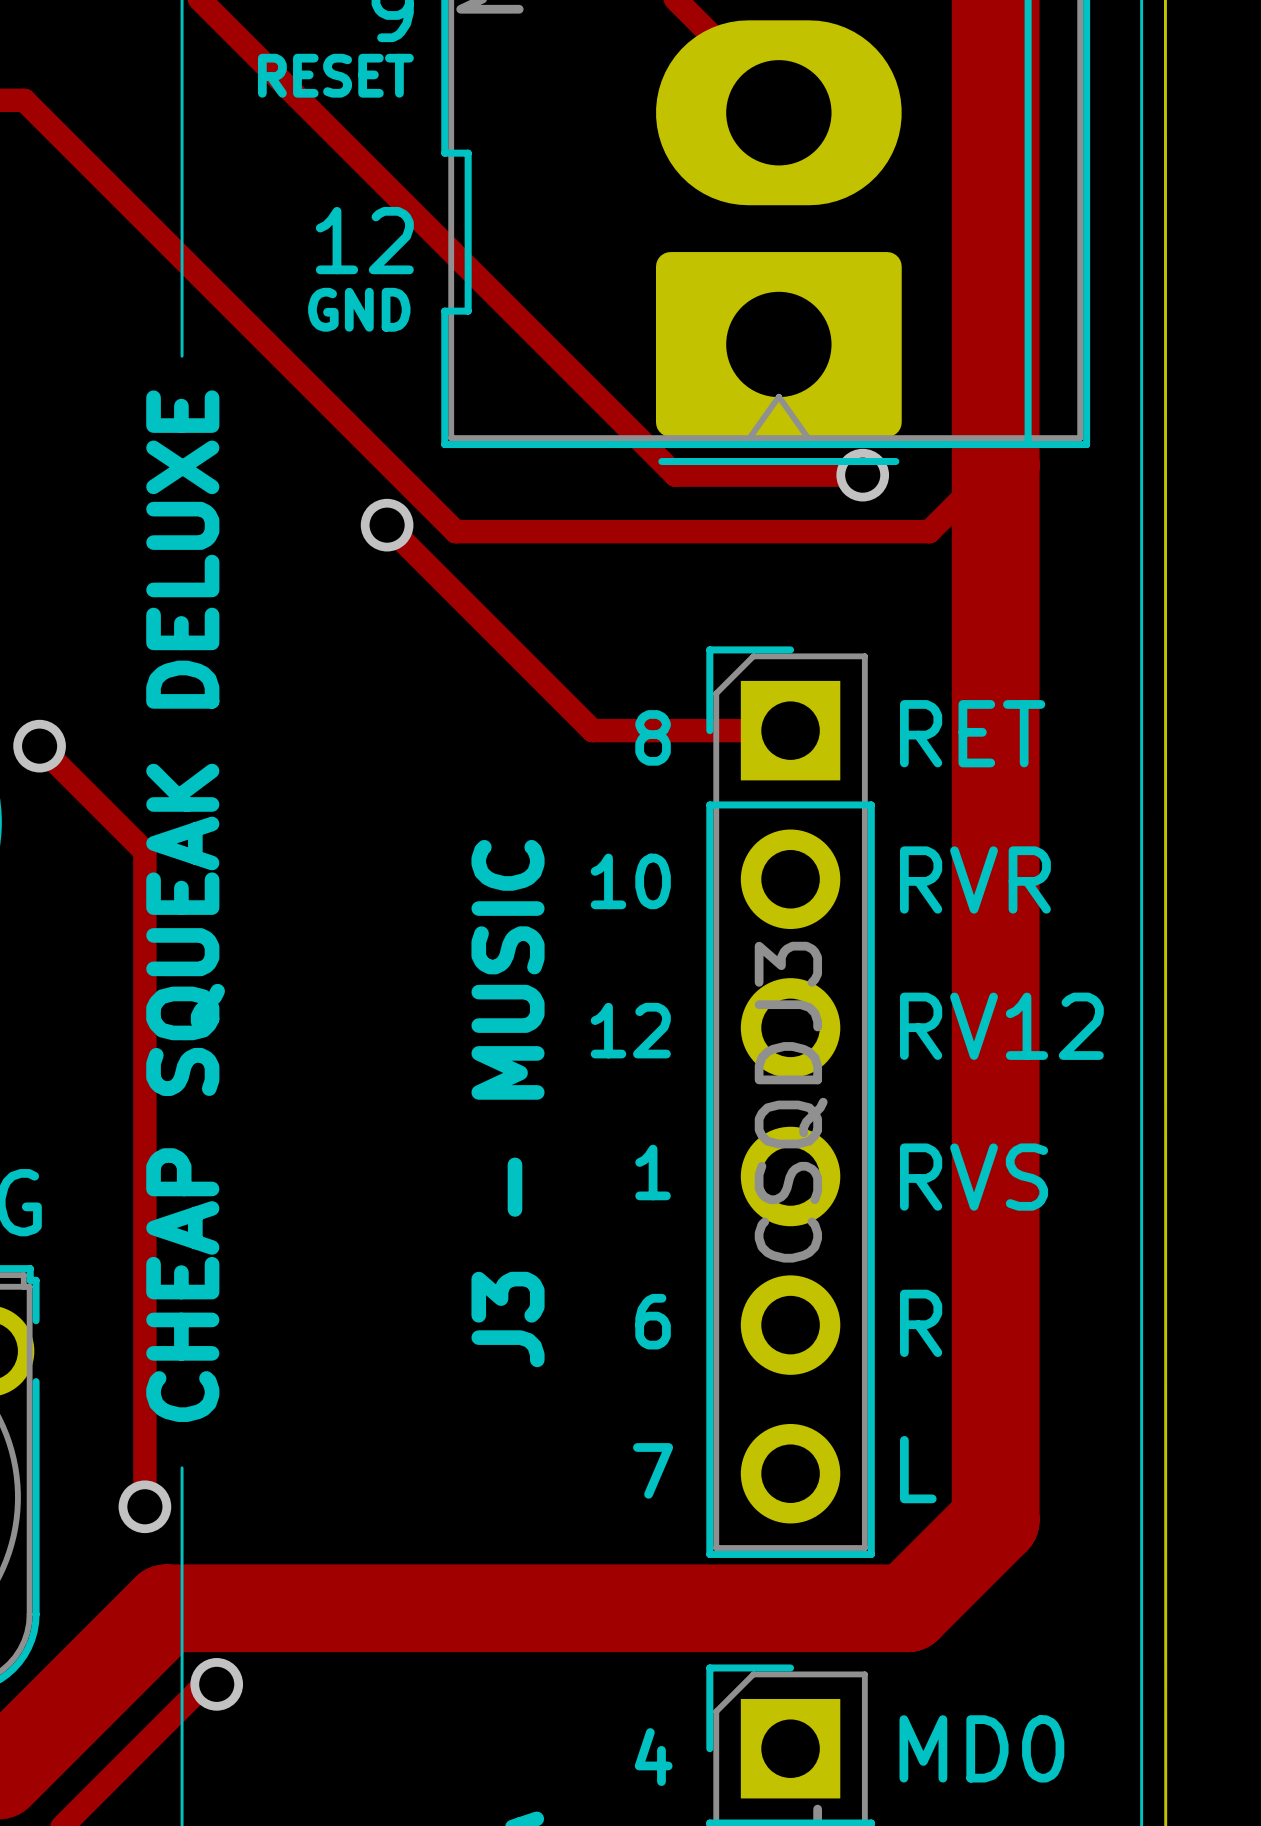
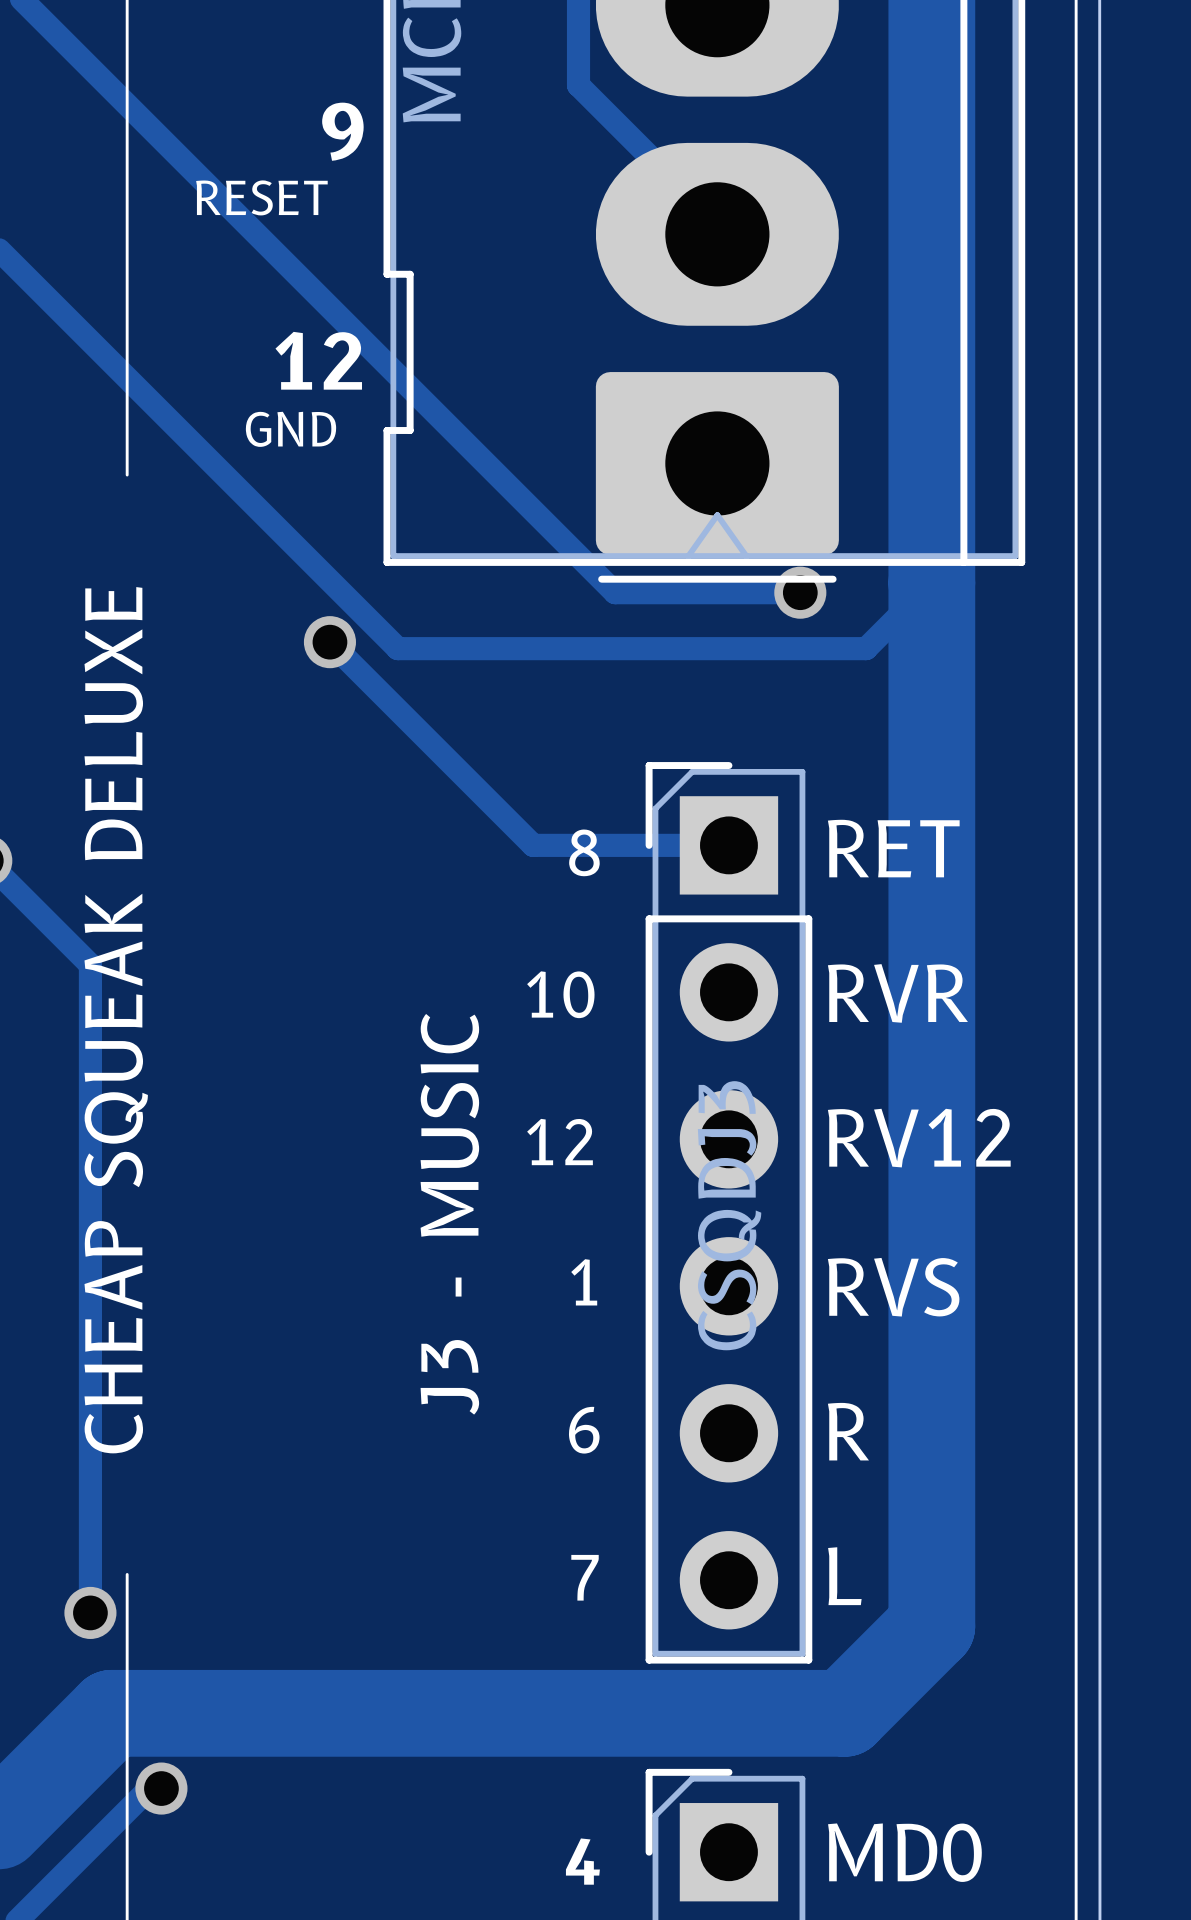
text position: CHEAP SQUEAK DELUXE (185, 906) -> CHEAP SQUEAK DELUXE (116, 1020)

